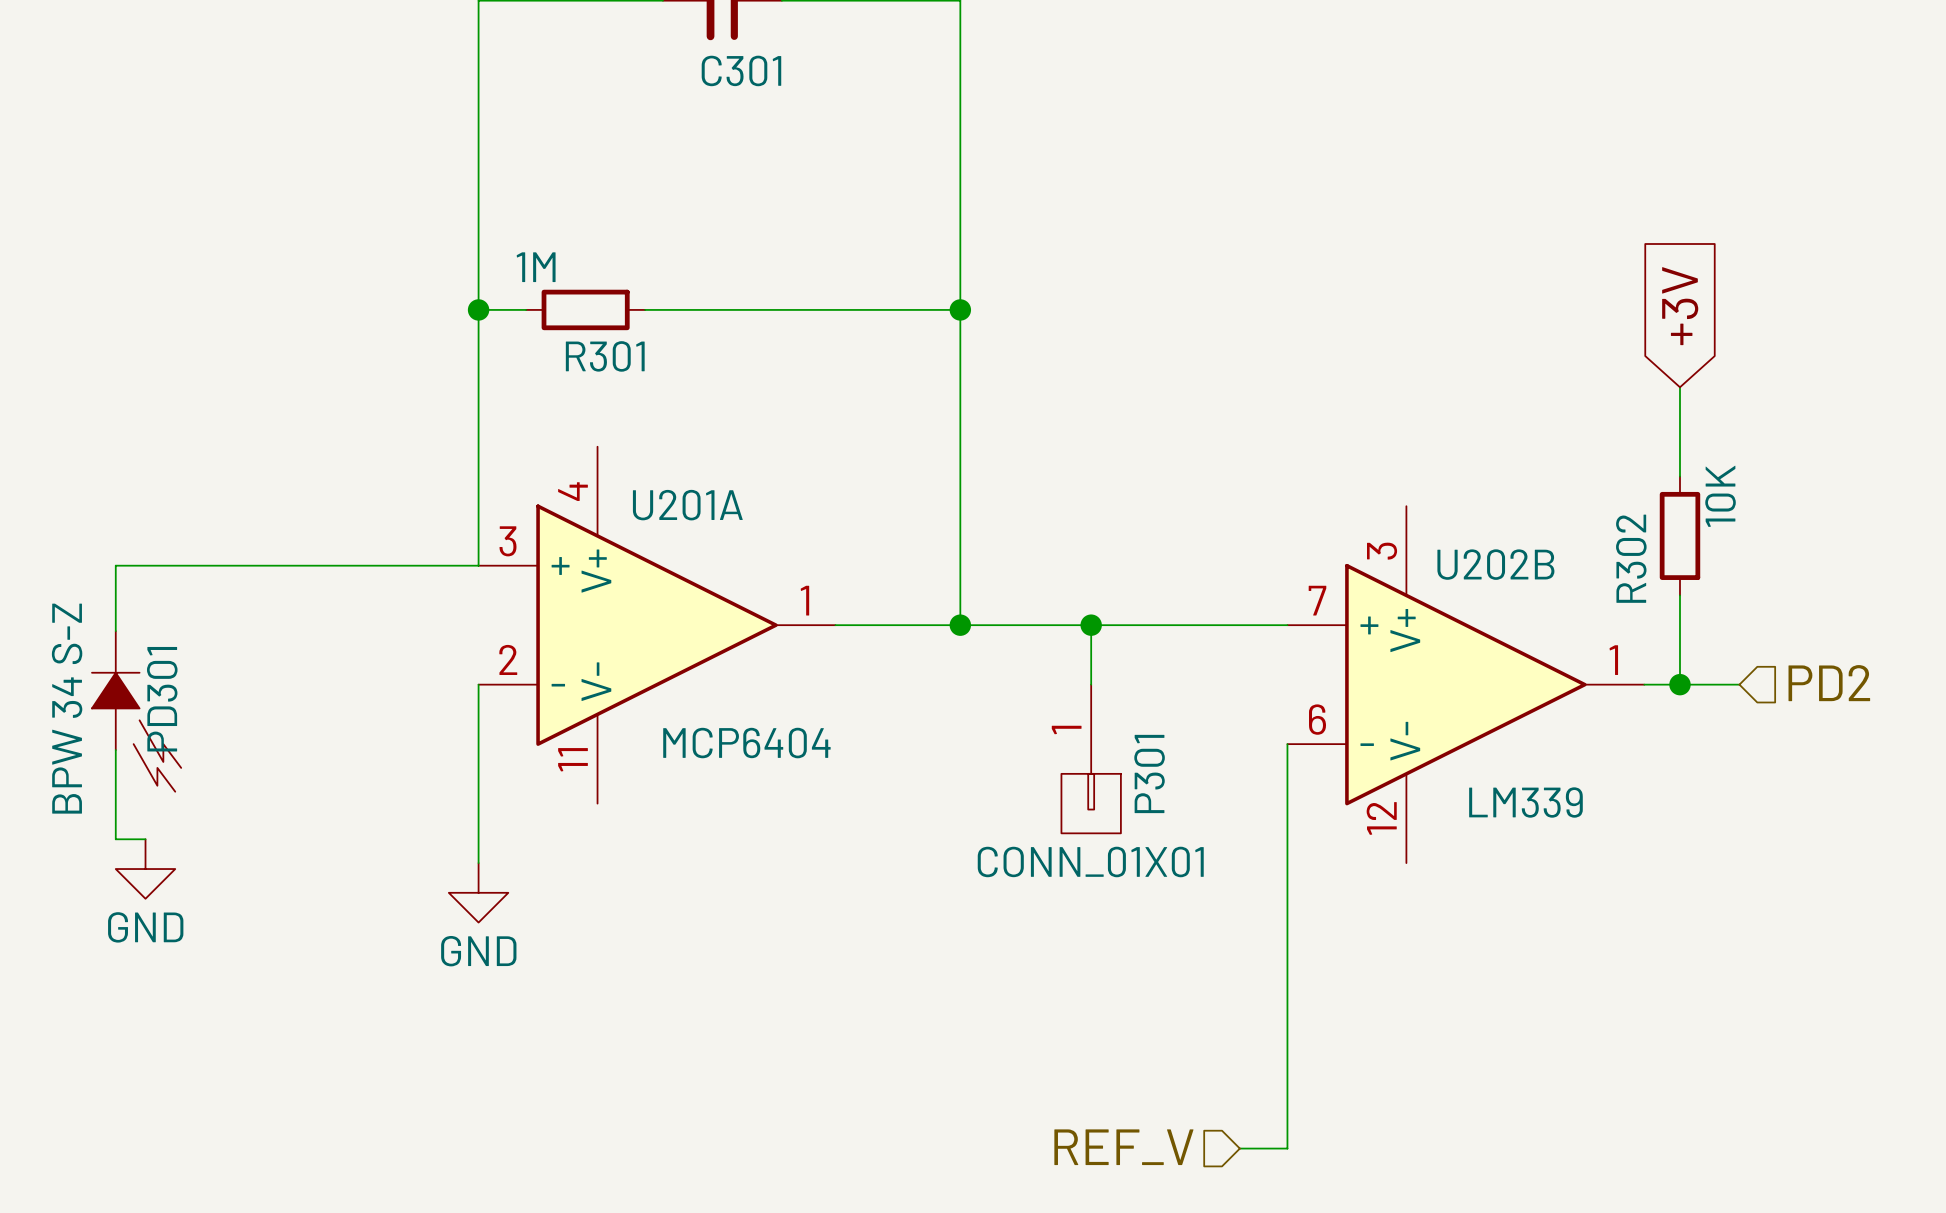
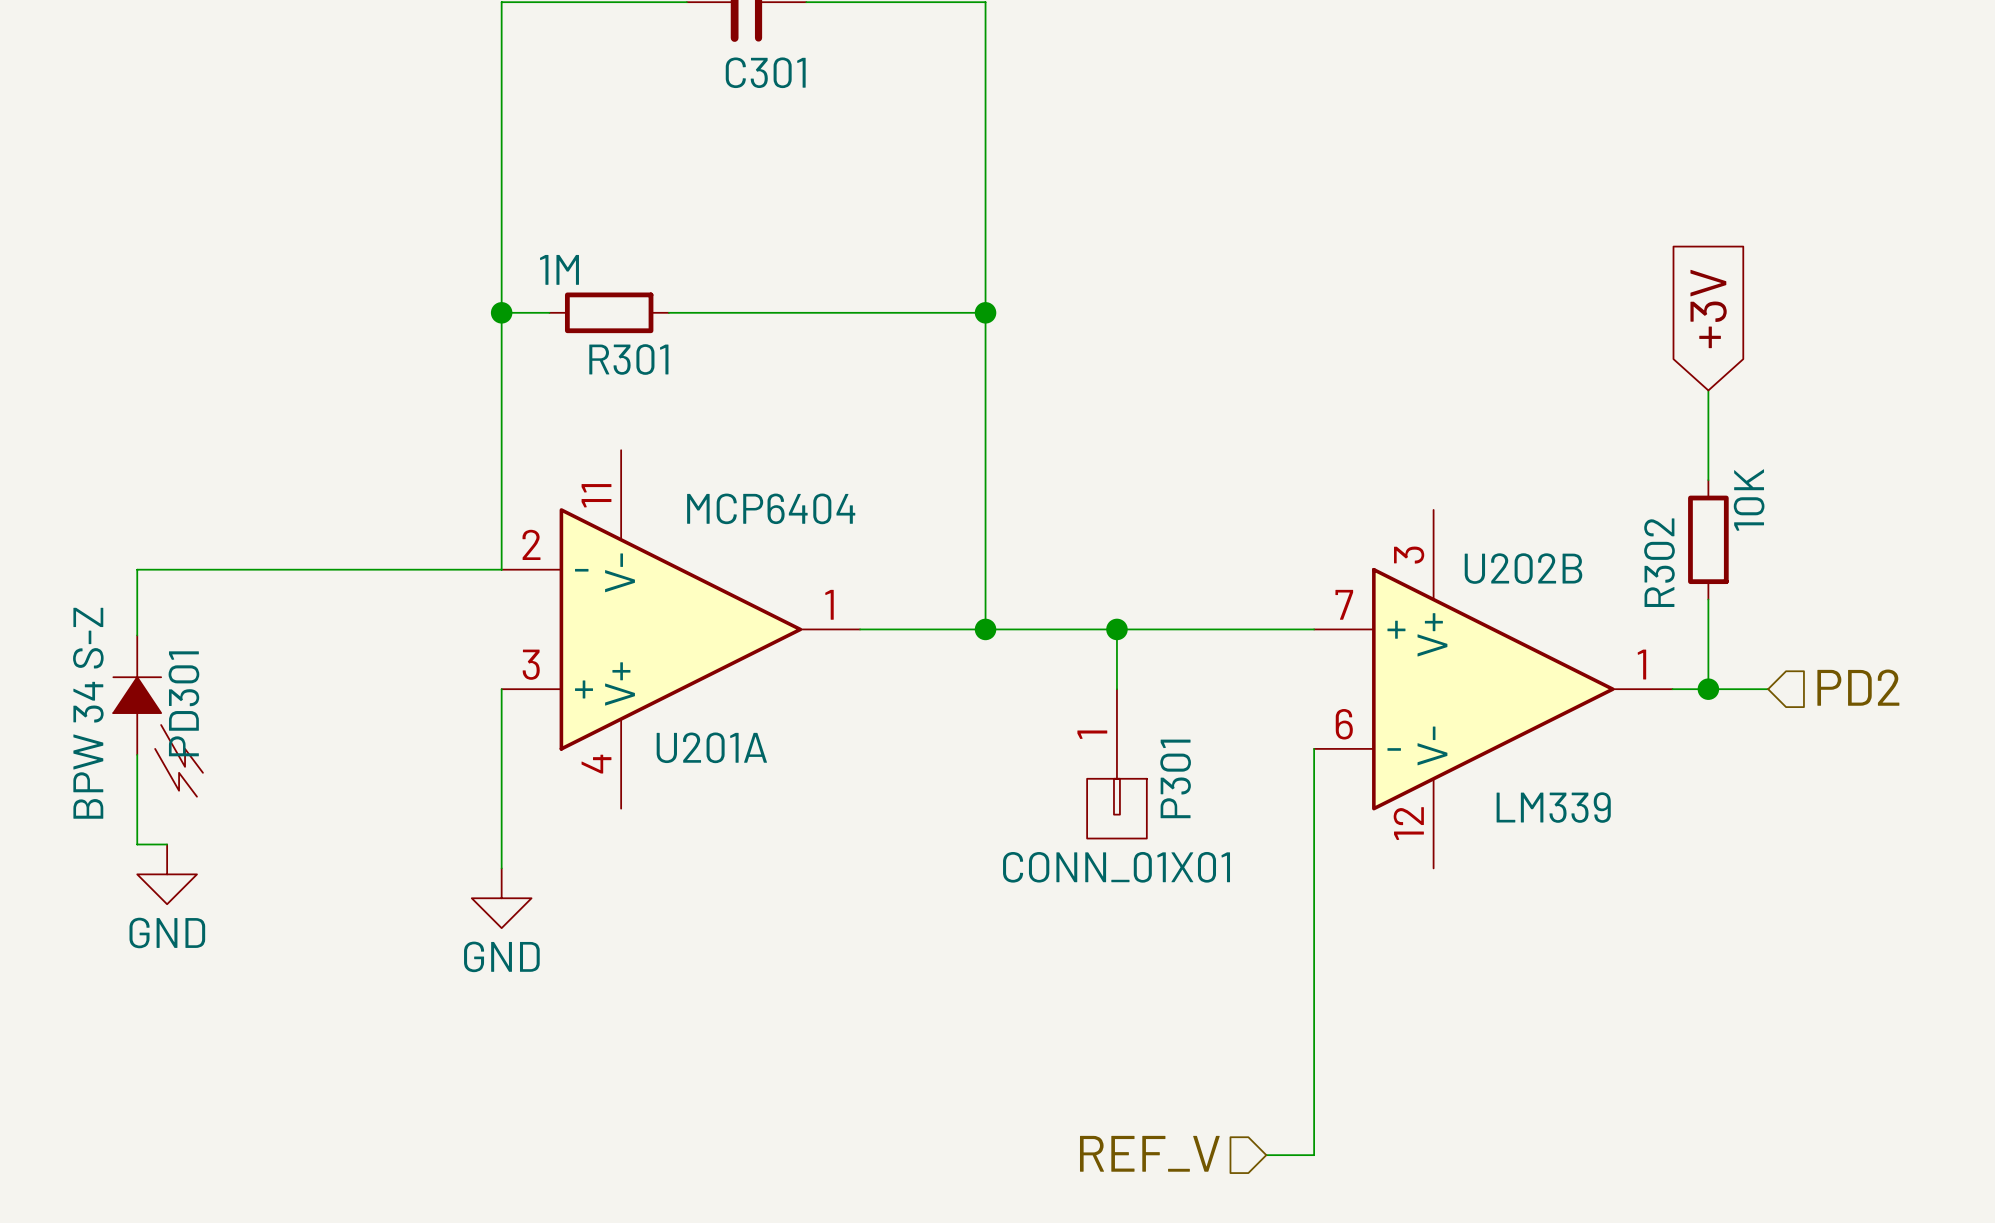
U201A flip: as is (657, 625) -> up-down (680, 629)

